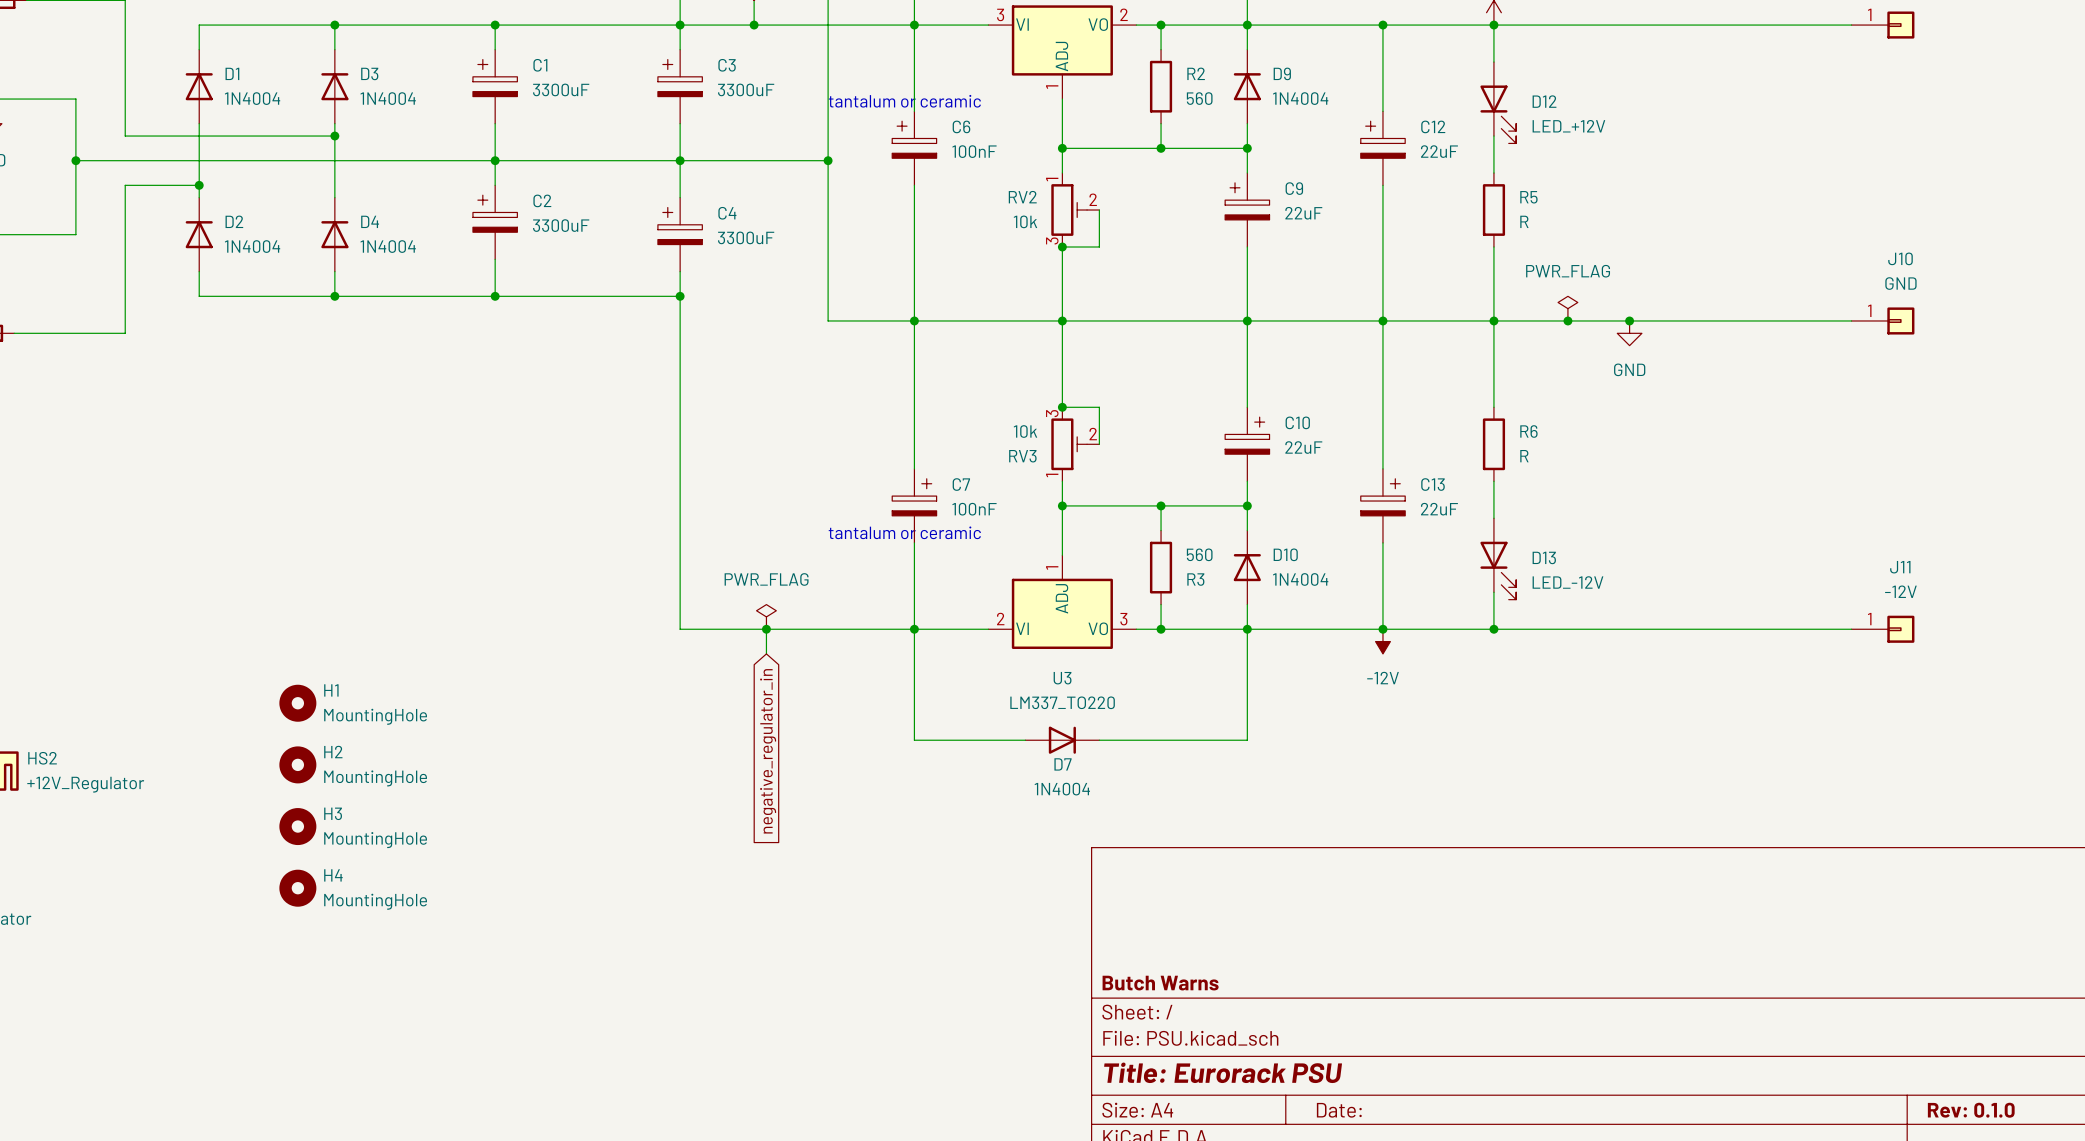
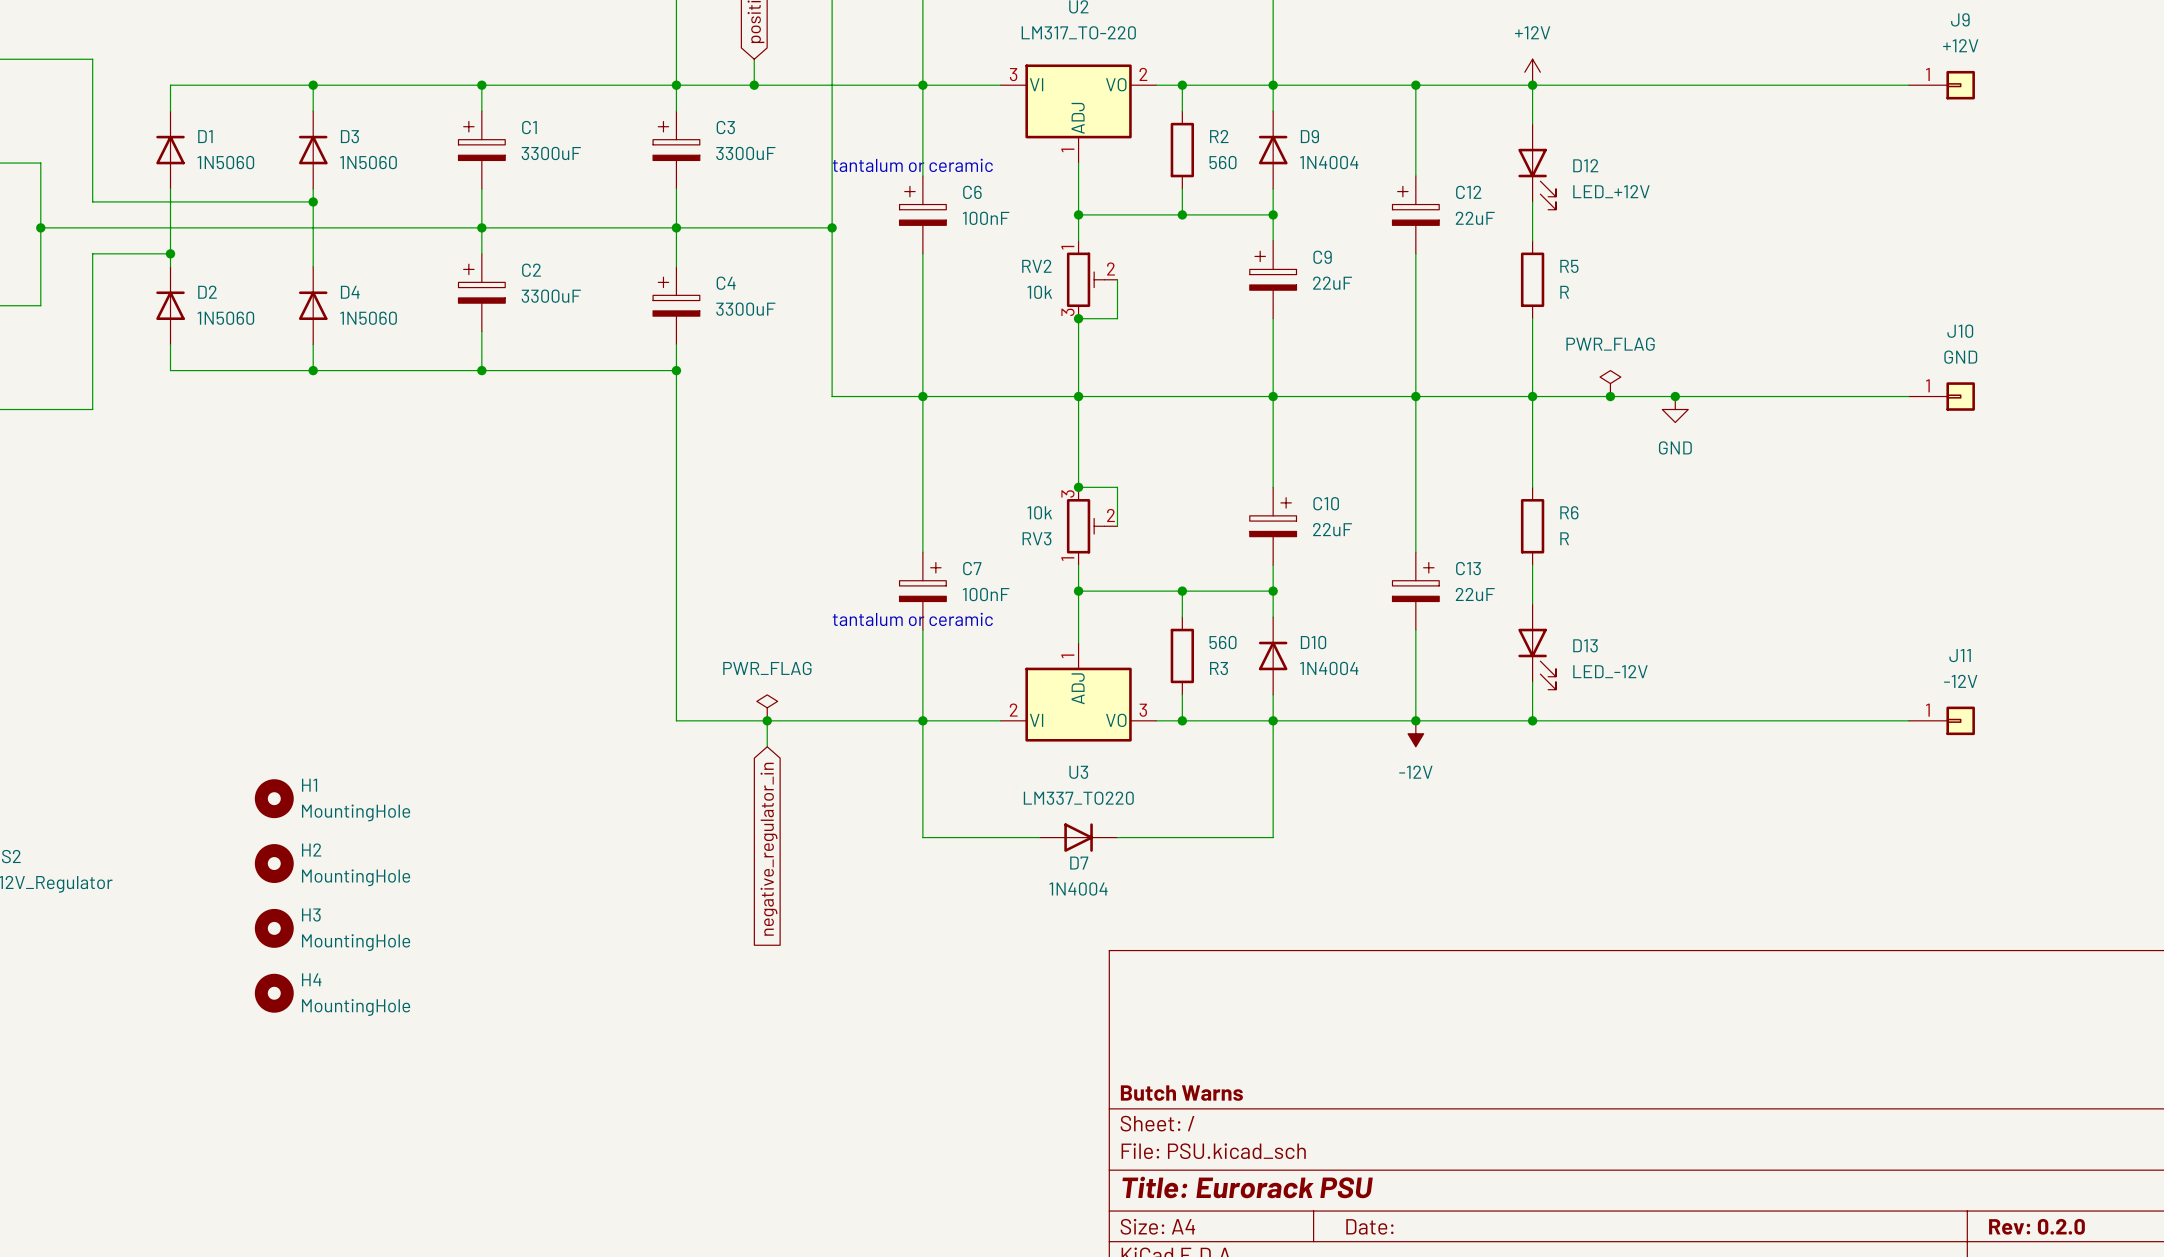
D1 value: 1N4004 (252, 98) -> 1N5060 (225, 162)
D3 value: 1N4004 (388, 98) -> 1N5060 (368, 162)
D2 value: 1N4004 (252, 246) -> 1N5060 (225, 318)
D4 value: 1N4004 (388, 246) -> 1N5060 (368, 318)
title block: Rev: 0.1.0 (1971, 1110) -> Rev: 0.2.0 (2036, 1226)

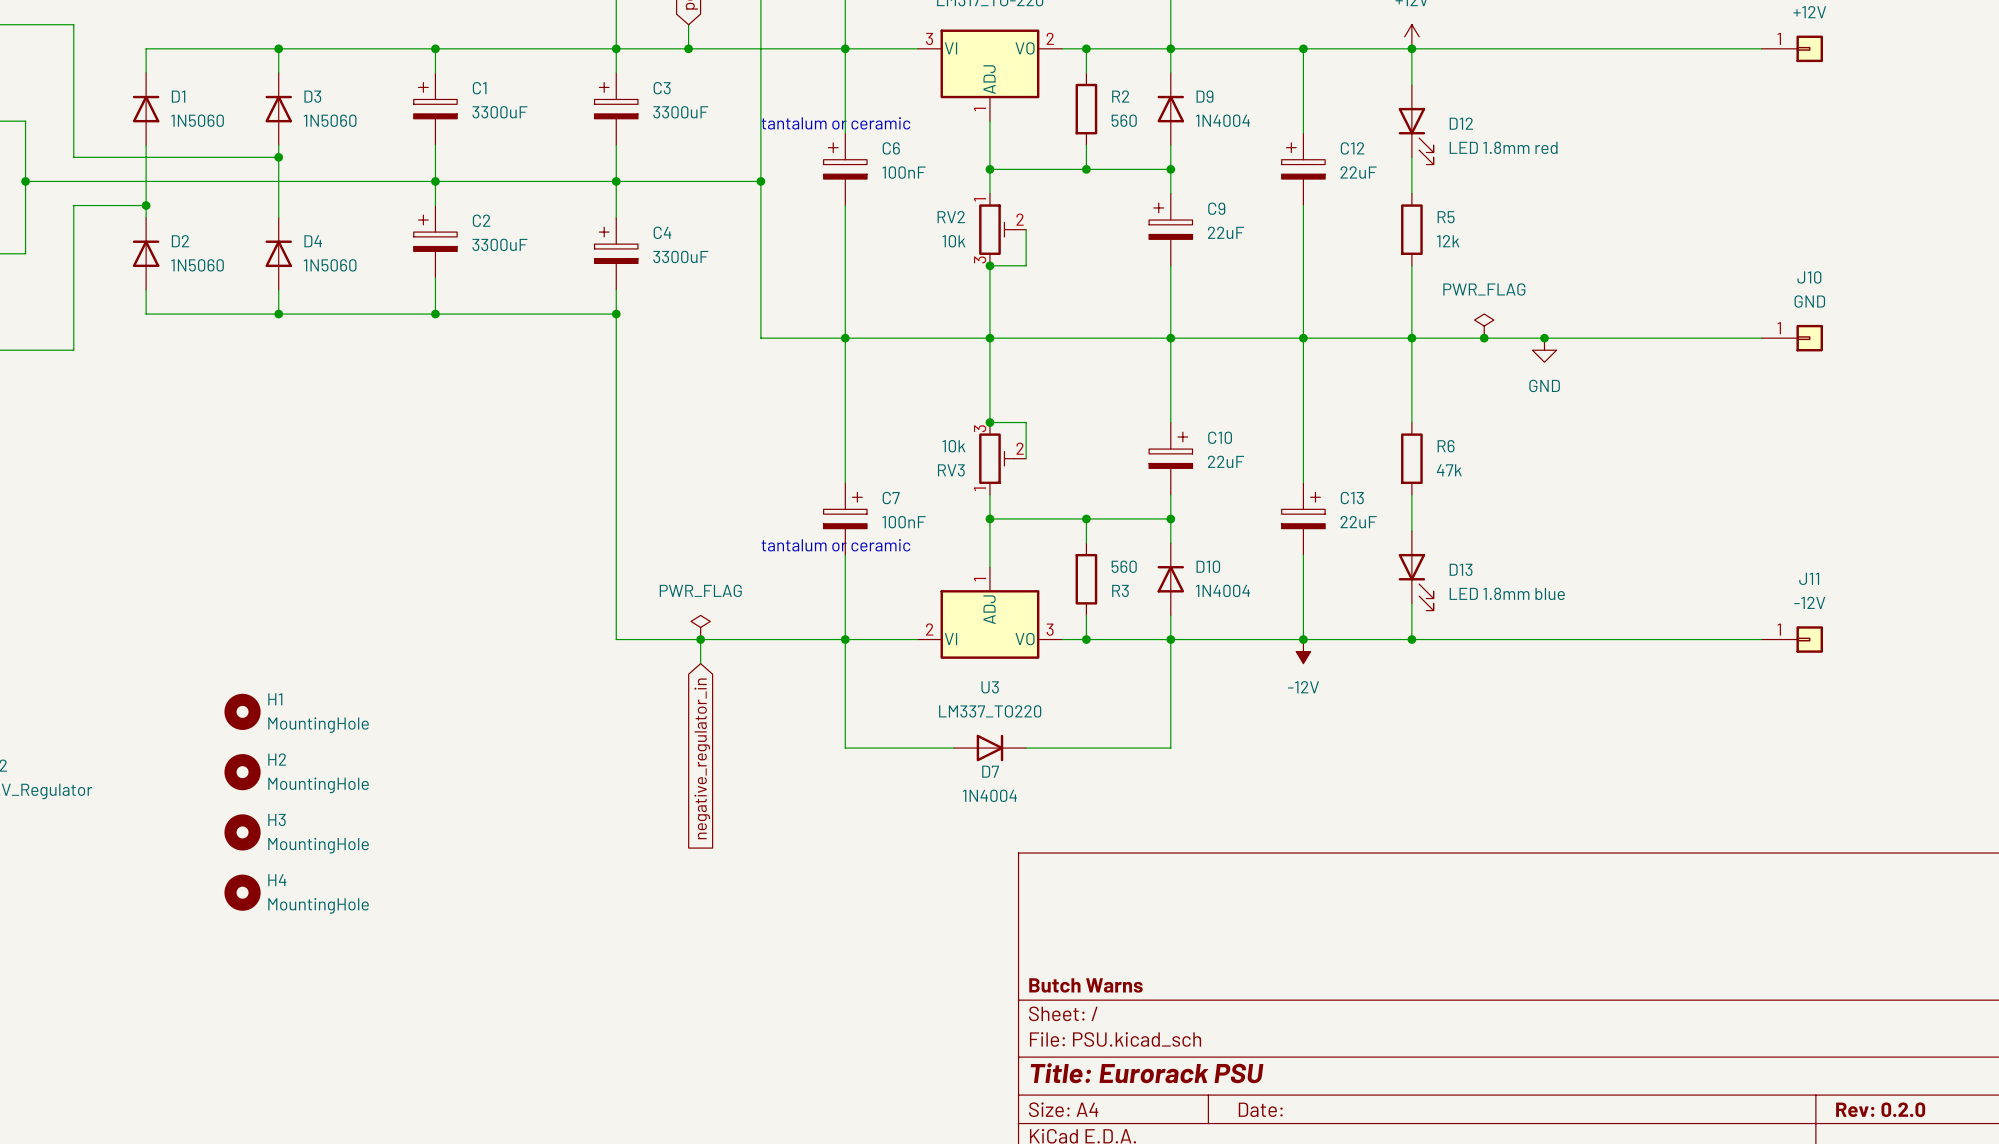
D12 value: LED_+12V (1611, 191) -> LED 1.8mm red (1503, 147)
R5 value: R (1564, 292) -> 12k (1448, 241)
R6 value: R (1564, 538) -> 47k (1449, 470)
D13 value: LED_-12V (1610, 671) -> LED 1.8mm blue (1507, 593)

